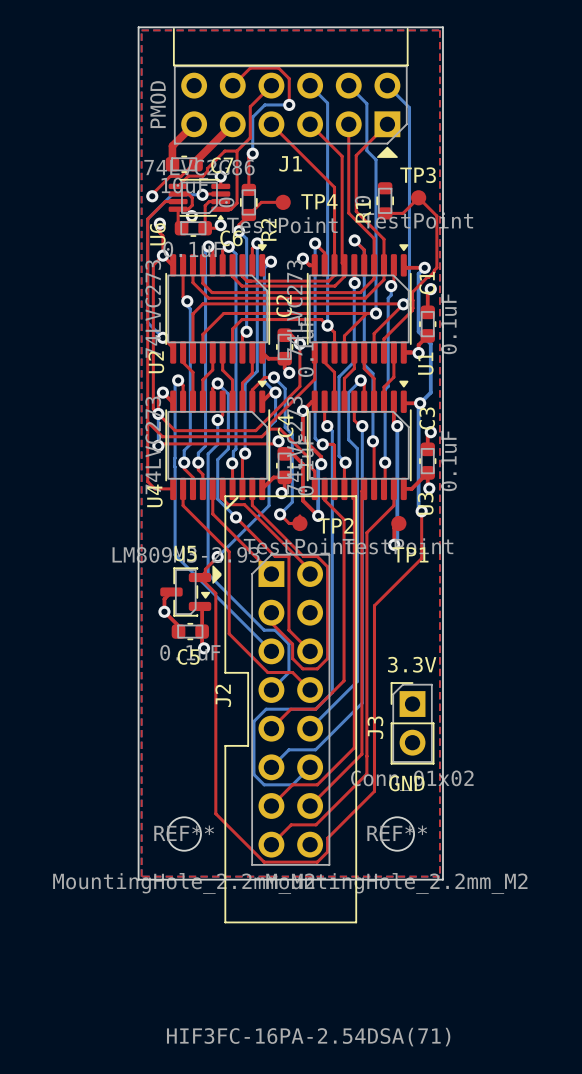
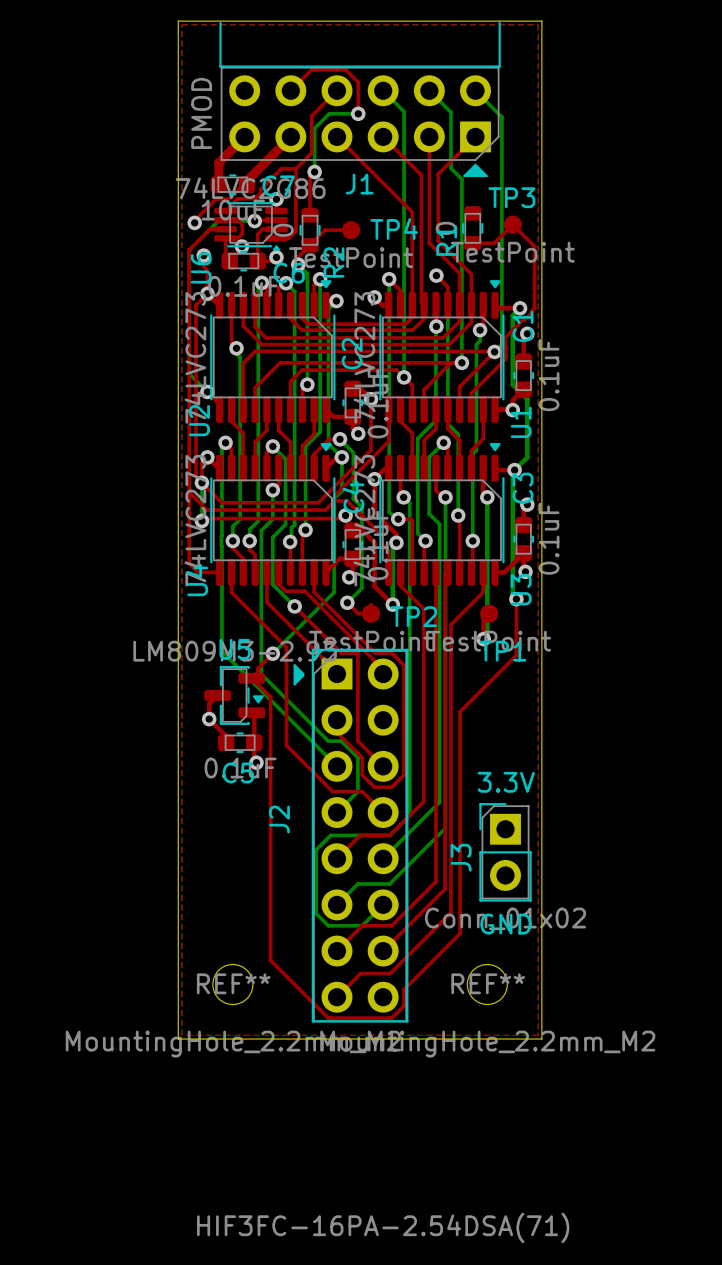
J2 footprint: [212, 495, 358, 924] -> [293, 648, 409, 1023]

